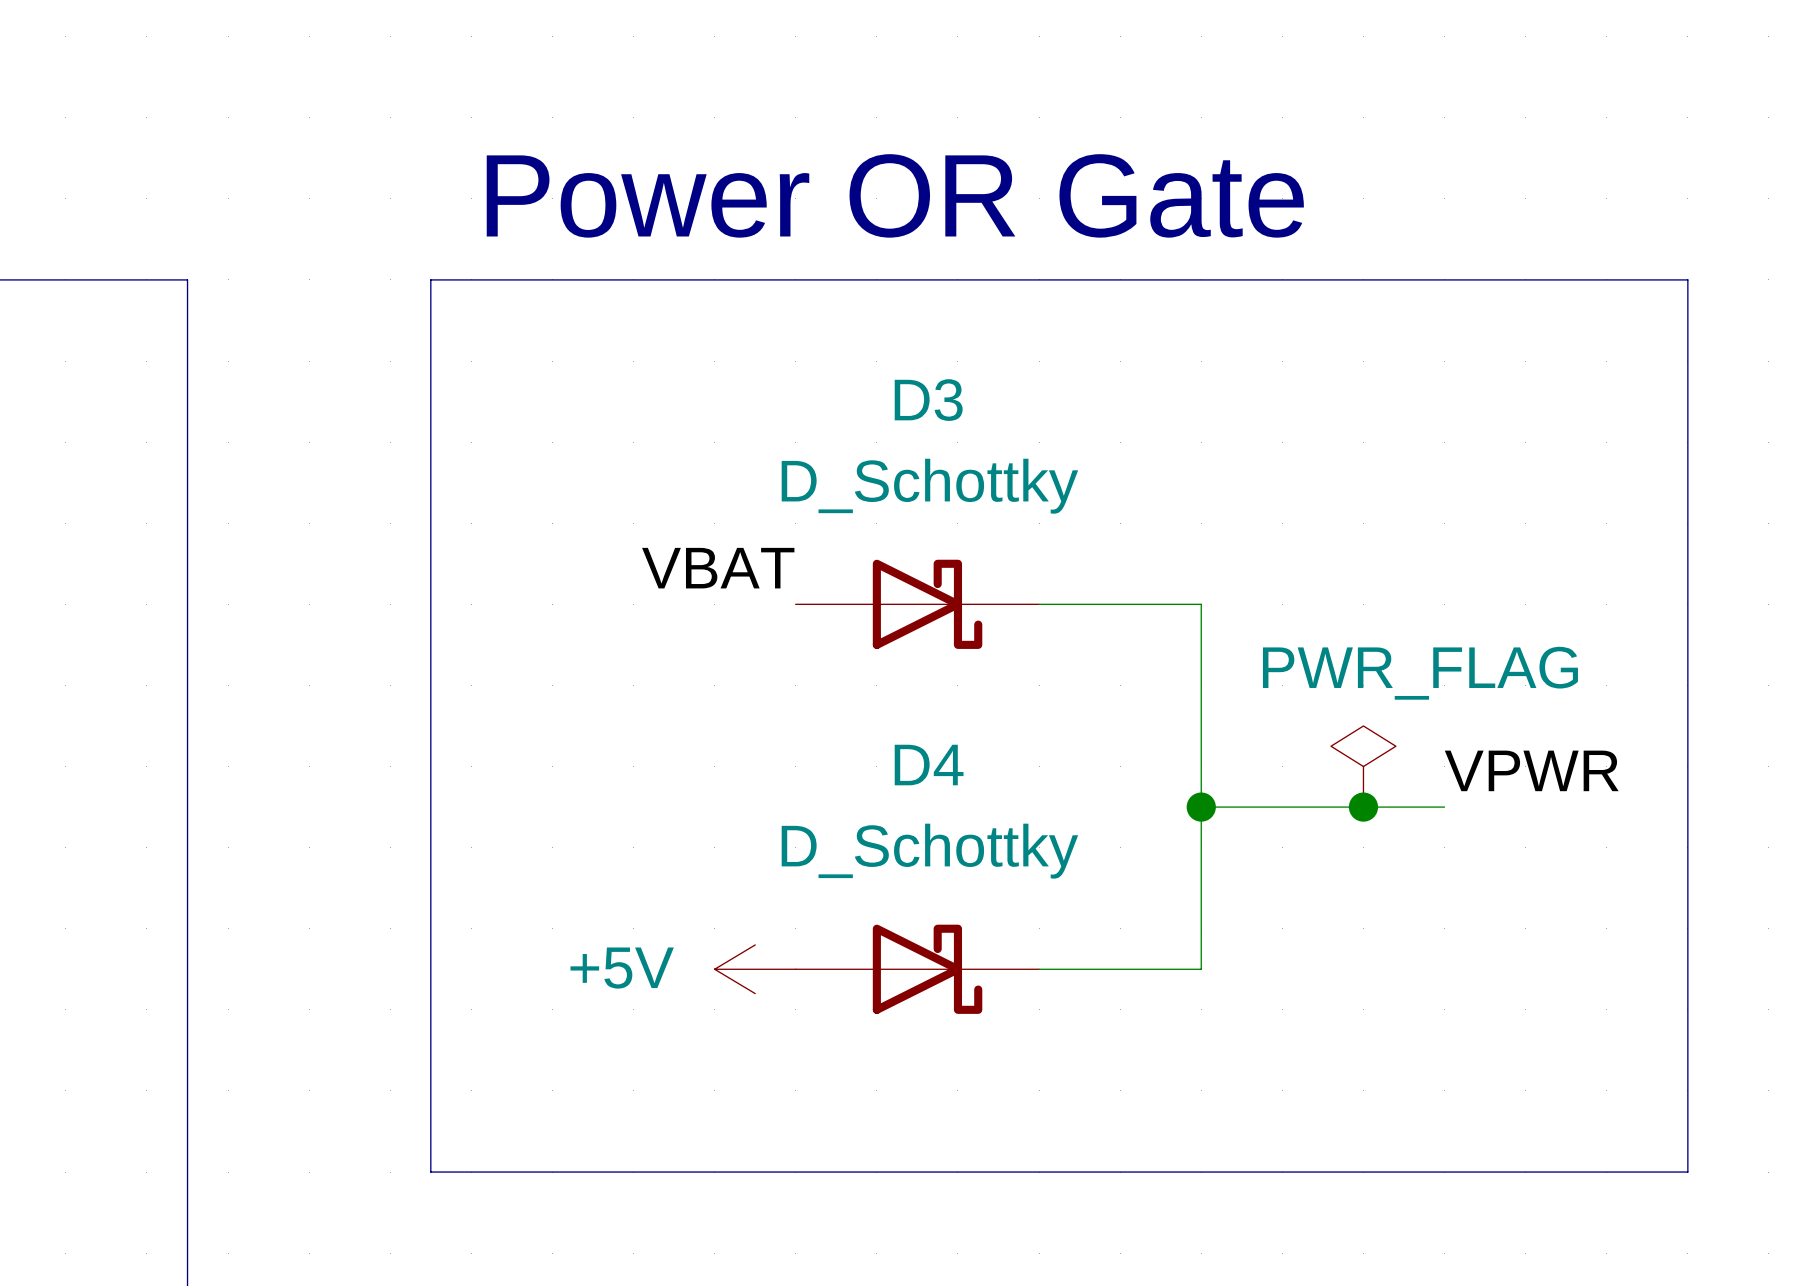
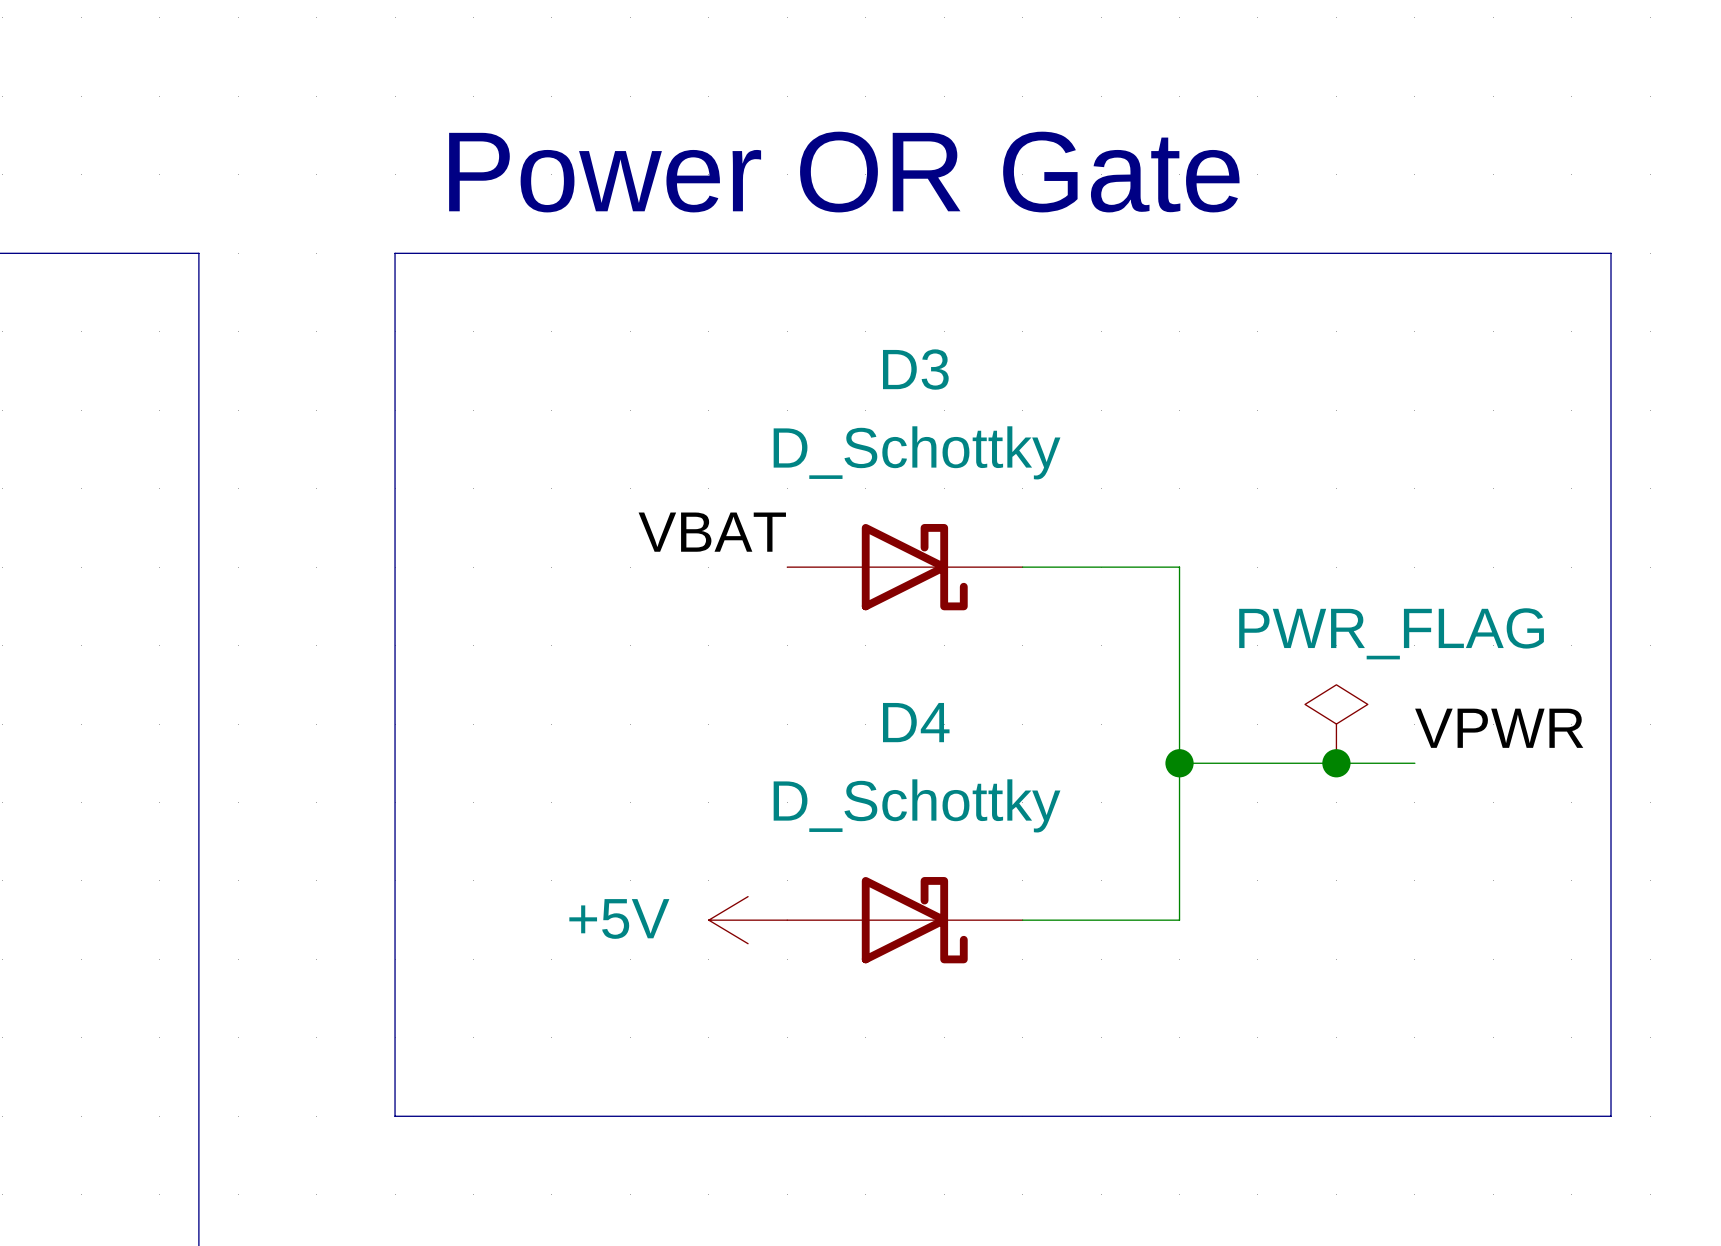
text position: Power OR Gate (895, 195) -> Power OR Gate (844, 172)
line: (430, 279) (430, 1172) -> (434, 253) (395, 253) (395, 1116) (434, 1116)
line: (1647, 279) (1687, 279) (1687, 1172) (1647, 1172) -> (1611, 253) (1611, 1116)

